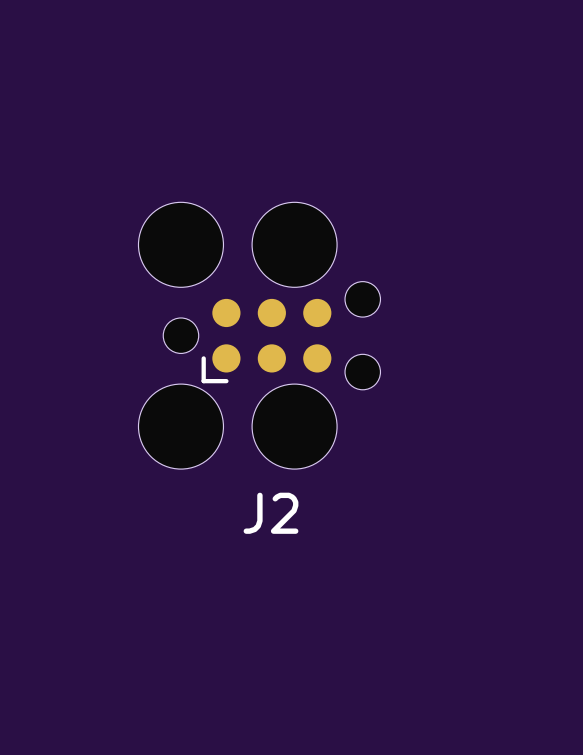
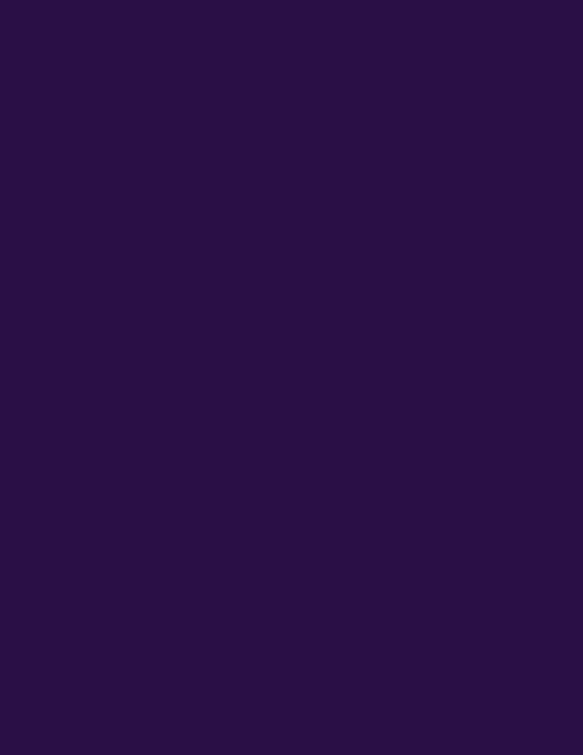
J2: (259, 335) -> none

